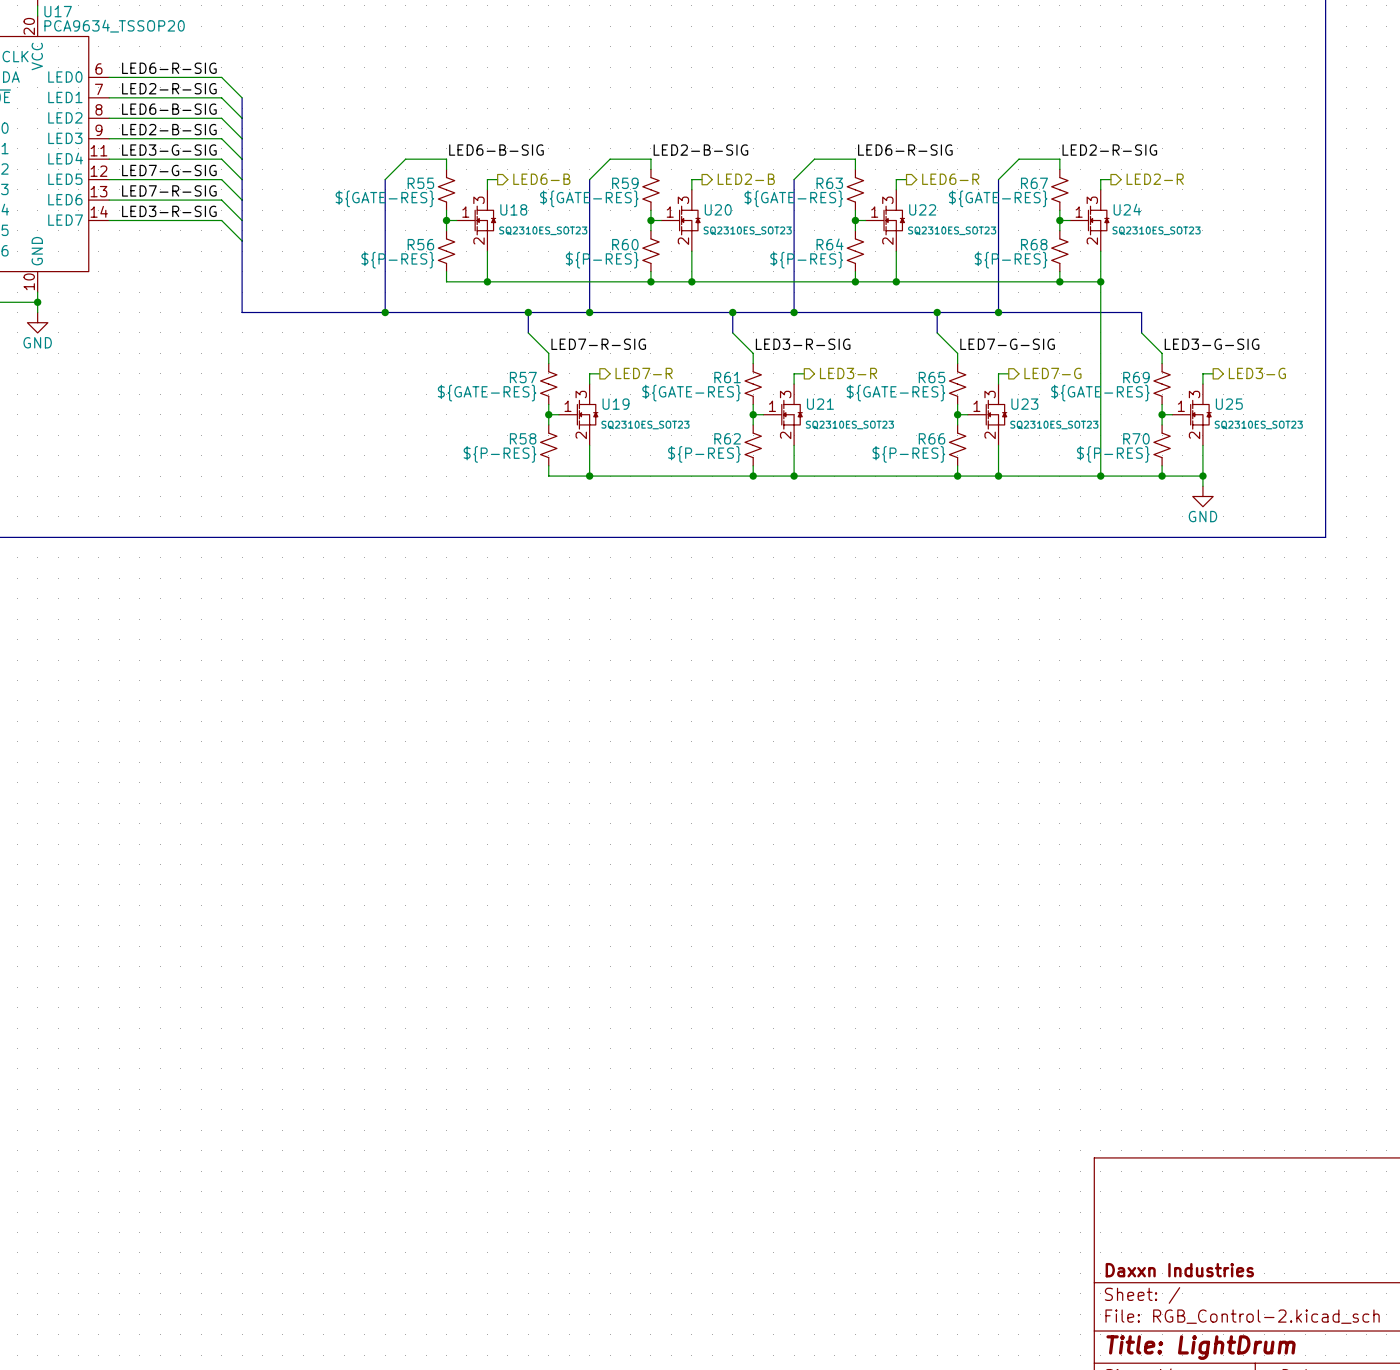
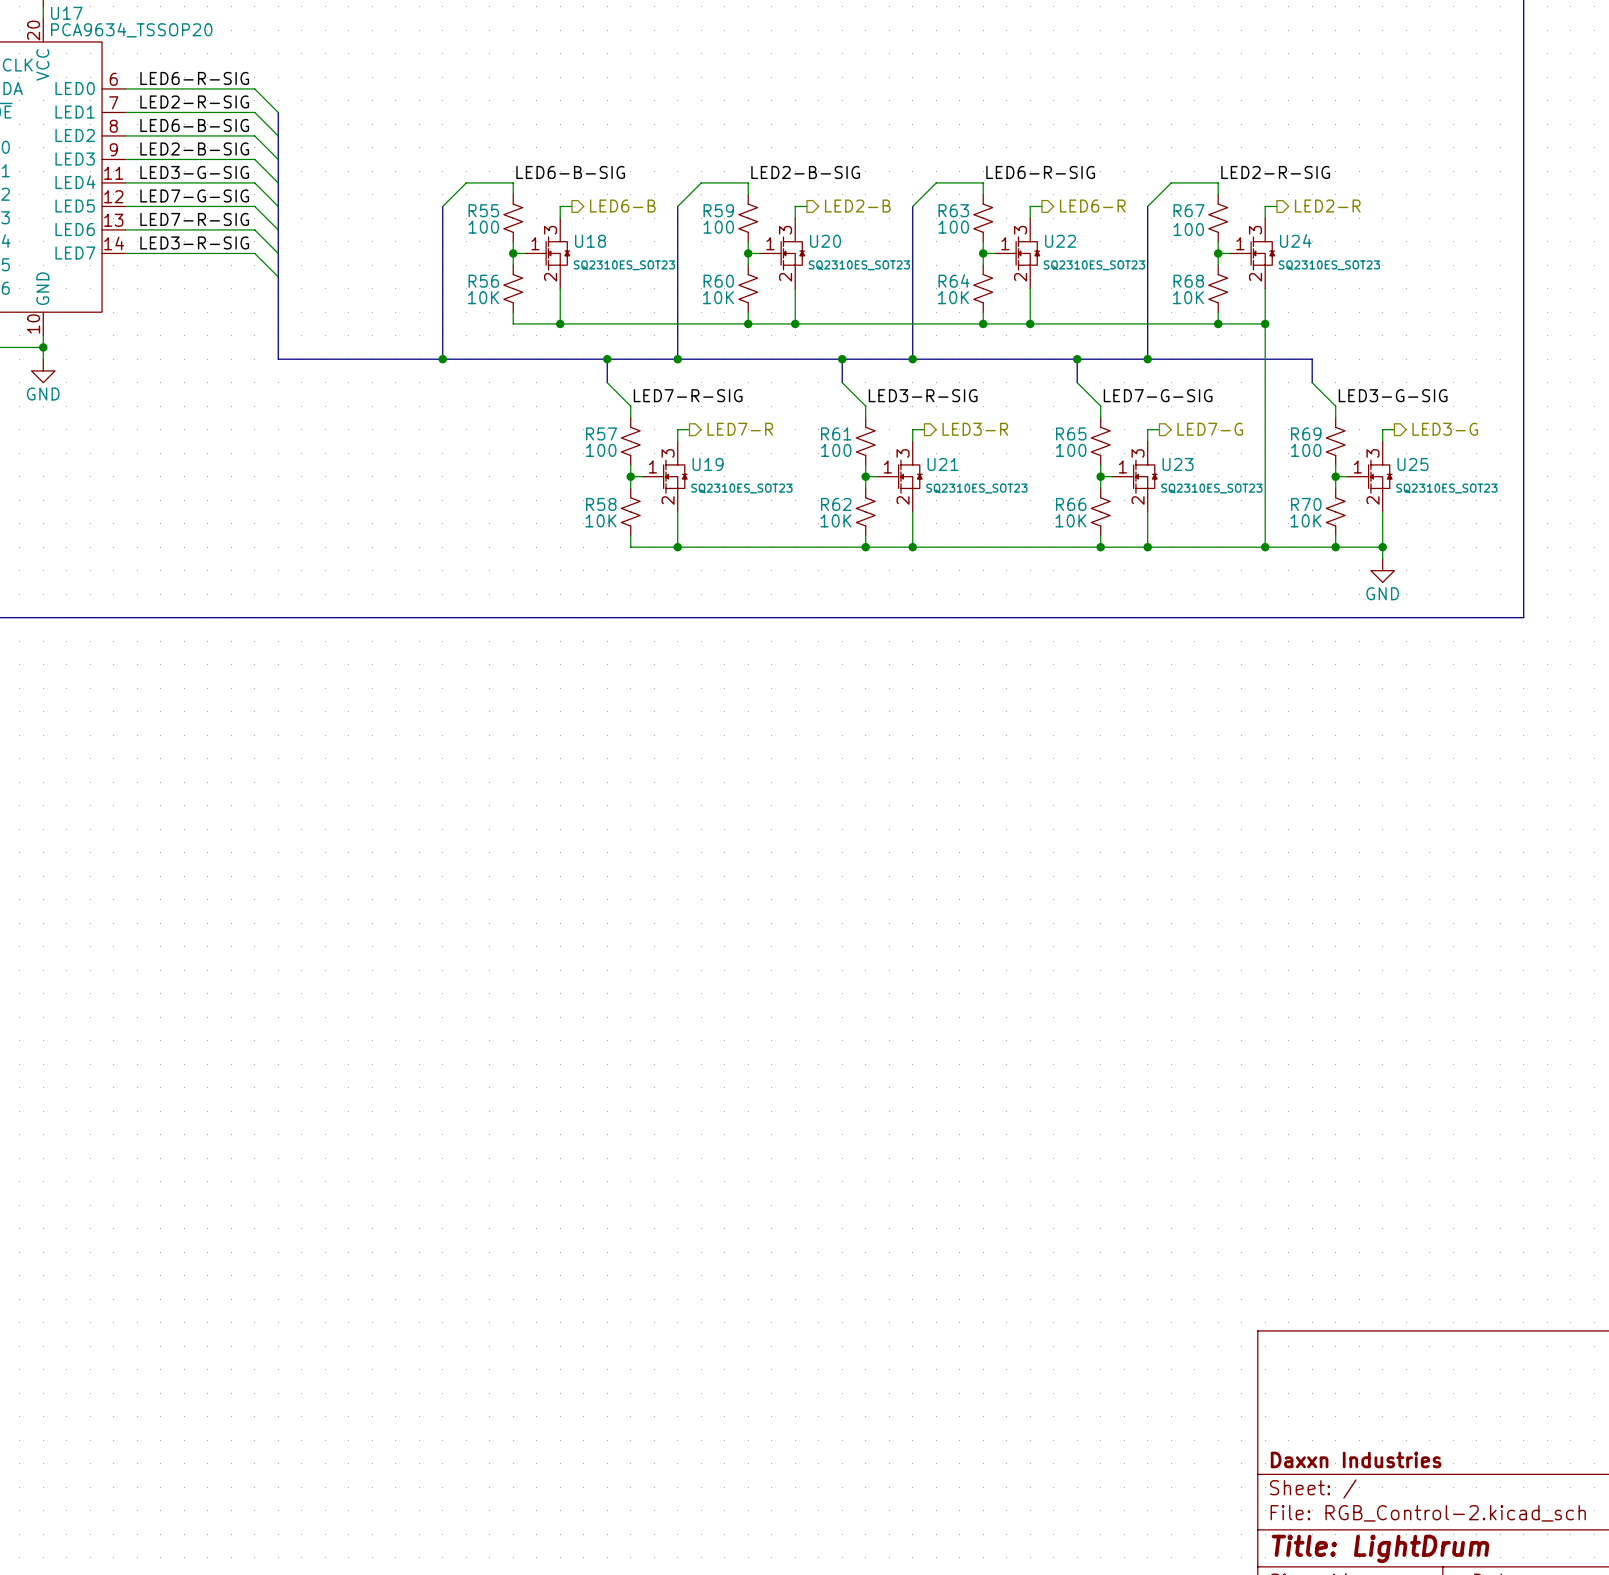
R55 value: ${GATE-RES} (384, 198) -> 100 (483, 227)
R59 value: ${GATE-RES} (589, 198) -> 100 (718, 227)
R63 value: ${GATE-RES} (793, 198) -> 100 (953, 227)
R67 value: ${GATE-RES} (998, 198) -> 100 (1188, 229)
R56 value: ${P-RES} (397, 260) -> 10K (483, 297)
R60 value: ${P-RES} (602, 260) -> 10K (718, 297)
R64 value: ${P-RES} (806, 260) -> 10K (953, 297)
R68 value: ${P-RES} (1011, 260) -> 10K (1188, 297)
R57 value: ${GATE-RES} (487, 393) -> 100 (601, 450)
R61 value: ${GATE-RES} (691, 393) -> 100 (836, 450)
R65 value: ${GATE-RES} (895, 393) -> 100 (1071, 450)
R69 value: ${GATE-RES} (1100, 393) -> 100 (1306, 450)
R58 value: ${P-RES} (500, 454) -> 10K (600, 520)
R62 value: ${P-RES} (704, 454) -> 10K (835, 520)
R66 value: ${P-RES} (908, 454) -> 10K (1070, 520)
R70 value: ${P-RES} (1113, 454) -> 10K (1305, 520)

